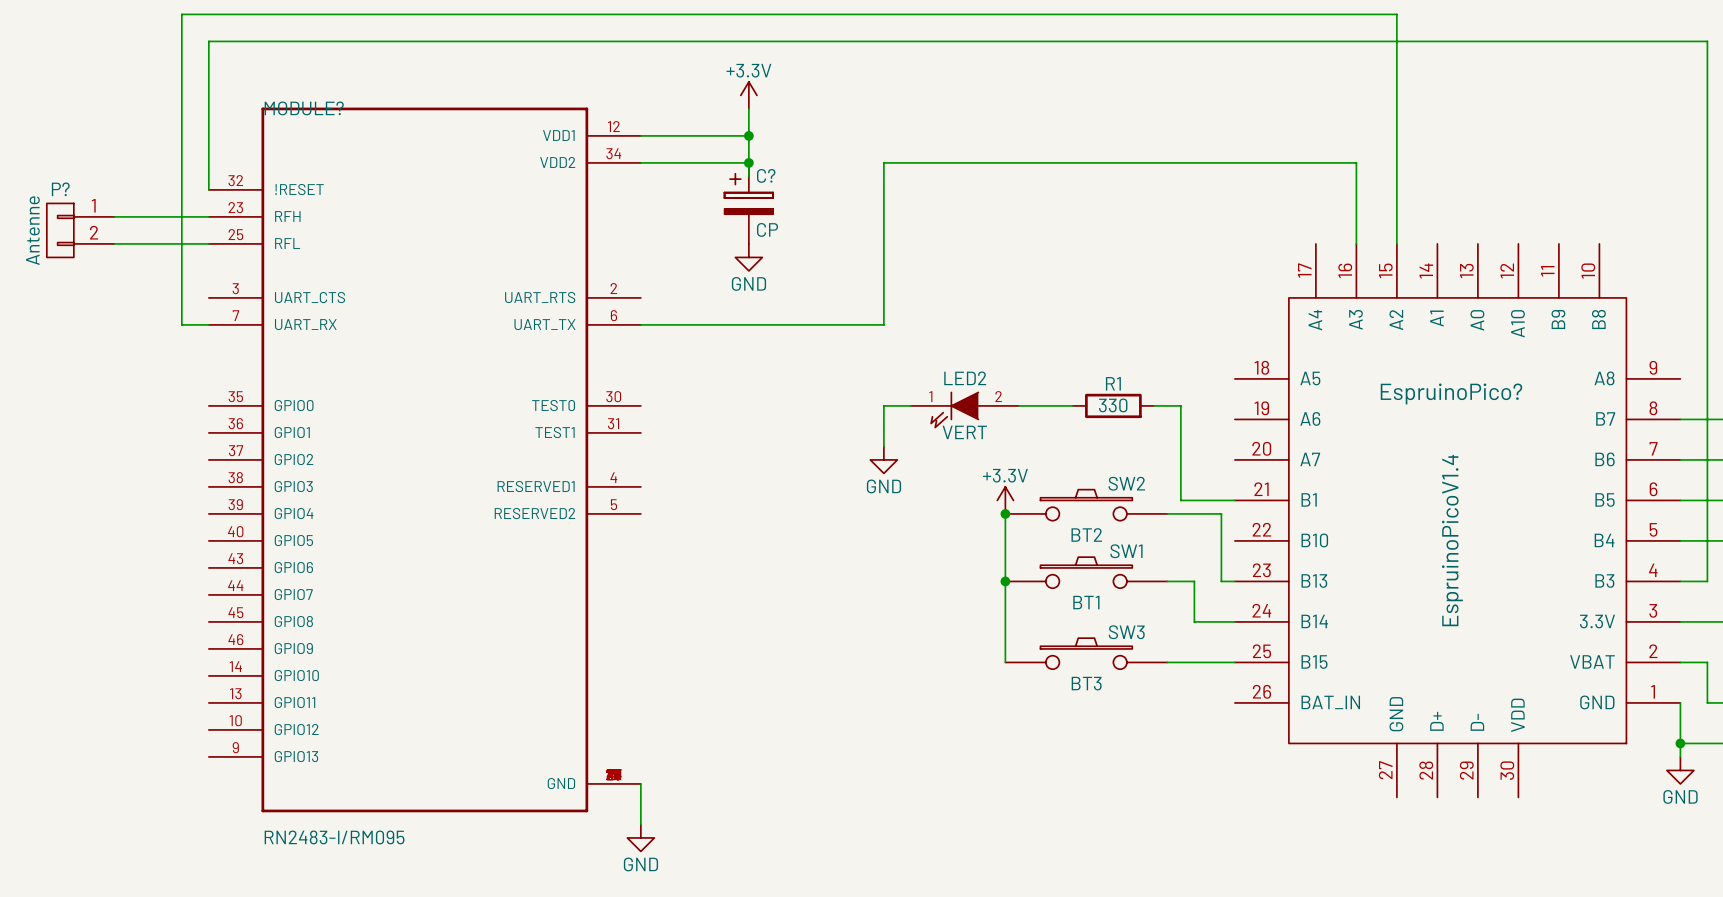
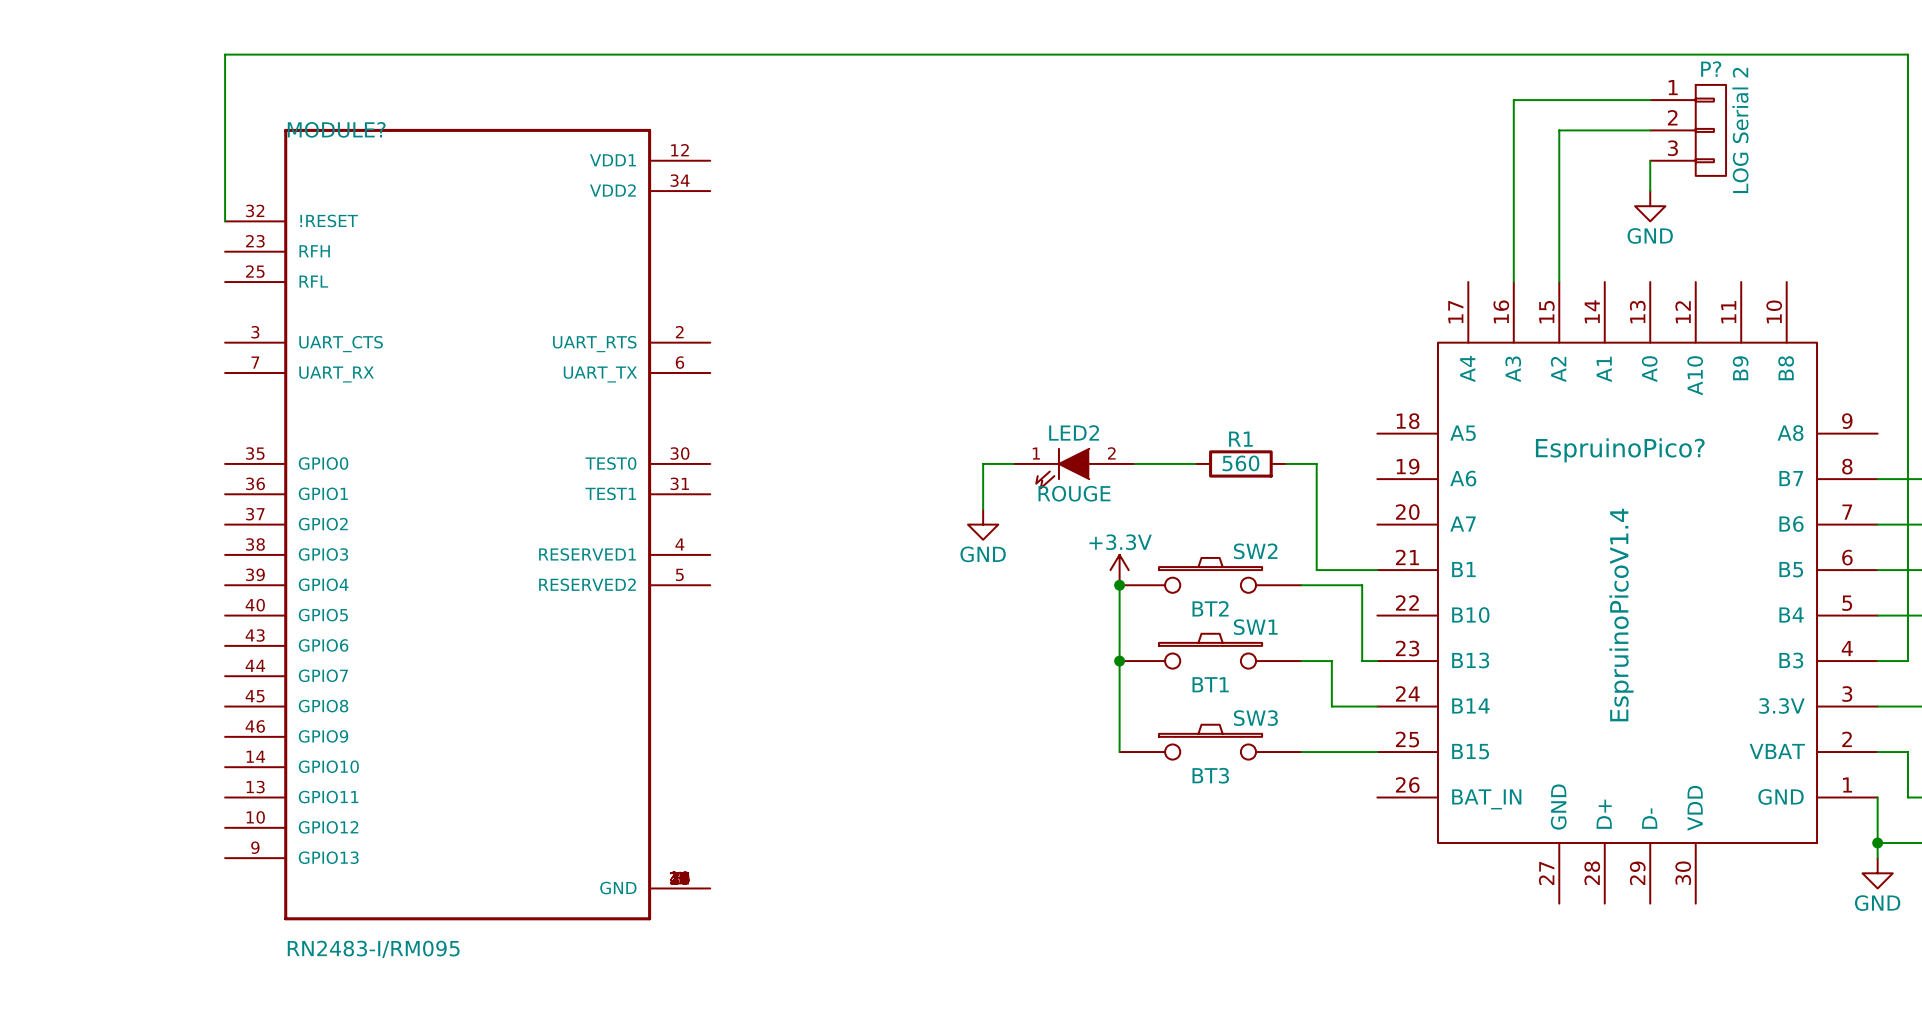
power symbol: +3.3V (748, 95) -> none
wire: (748, 108) (748, 176) -> none
wire: (1396, 108) (1396, 14) (181, 14) (181, 324) (208, 324) -> (1559, 130) (1650, 130)
P?: none -> LOG Serial 2 (1688, 130)
wire: (640, 135) (748, 135) -> none
junction: (748, 135) -> none
wire: none -> (1650, 160) (1650, 191)
wire: (640, 162) (748, 162) -> none
junction: (748, 162) -> none
wire: (1356, 162) (883, 162) (883, 324) (640, 324) -> (1513, 191) (1513, 100) (1650, 100)
power symbol: none -> GND (1650, 206)
C?: CP (748, 203) -> none
wire: (114, 216) (208, 216) -> none
P?: Antenne (80, 230) -> none
wire: (114, 243) (208, 243) -> none
power symbol: GND (748, 257) -> none
R1 value: 330 (1113, 405) -> 560 (1241, 463)
LED2 value: VERT (964, 432) -> ROUGE (1074, 493)
wire: (640, 783) (640, 824) -> none
power symbol: GND (640, 837) -> none

